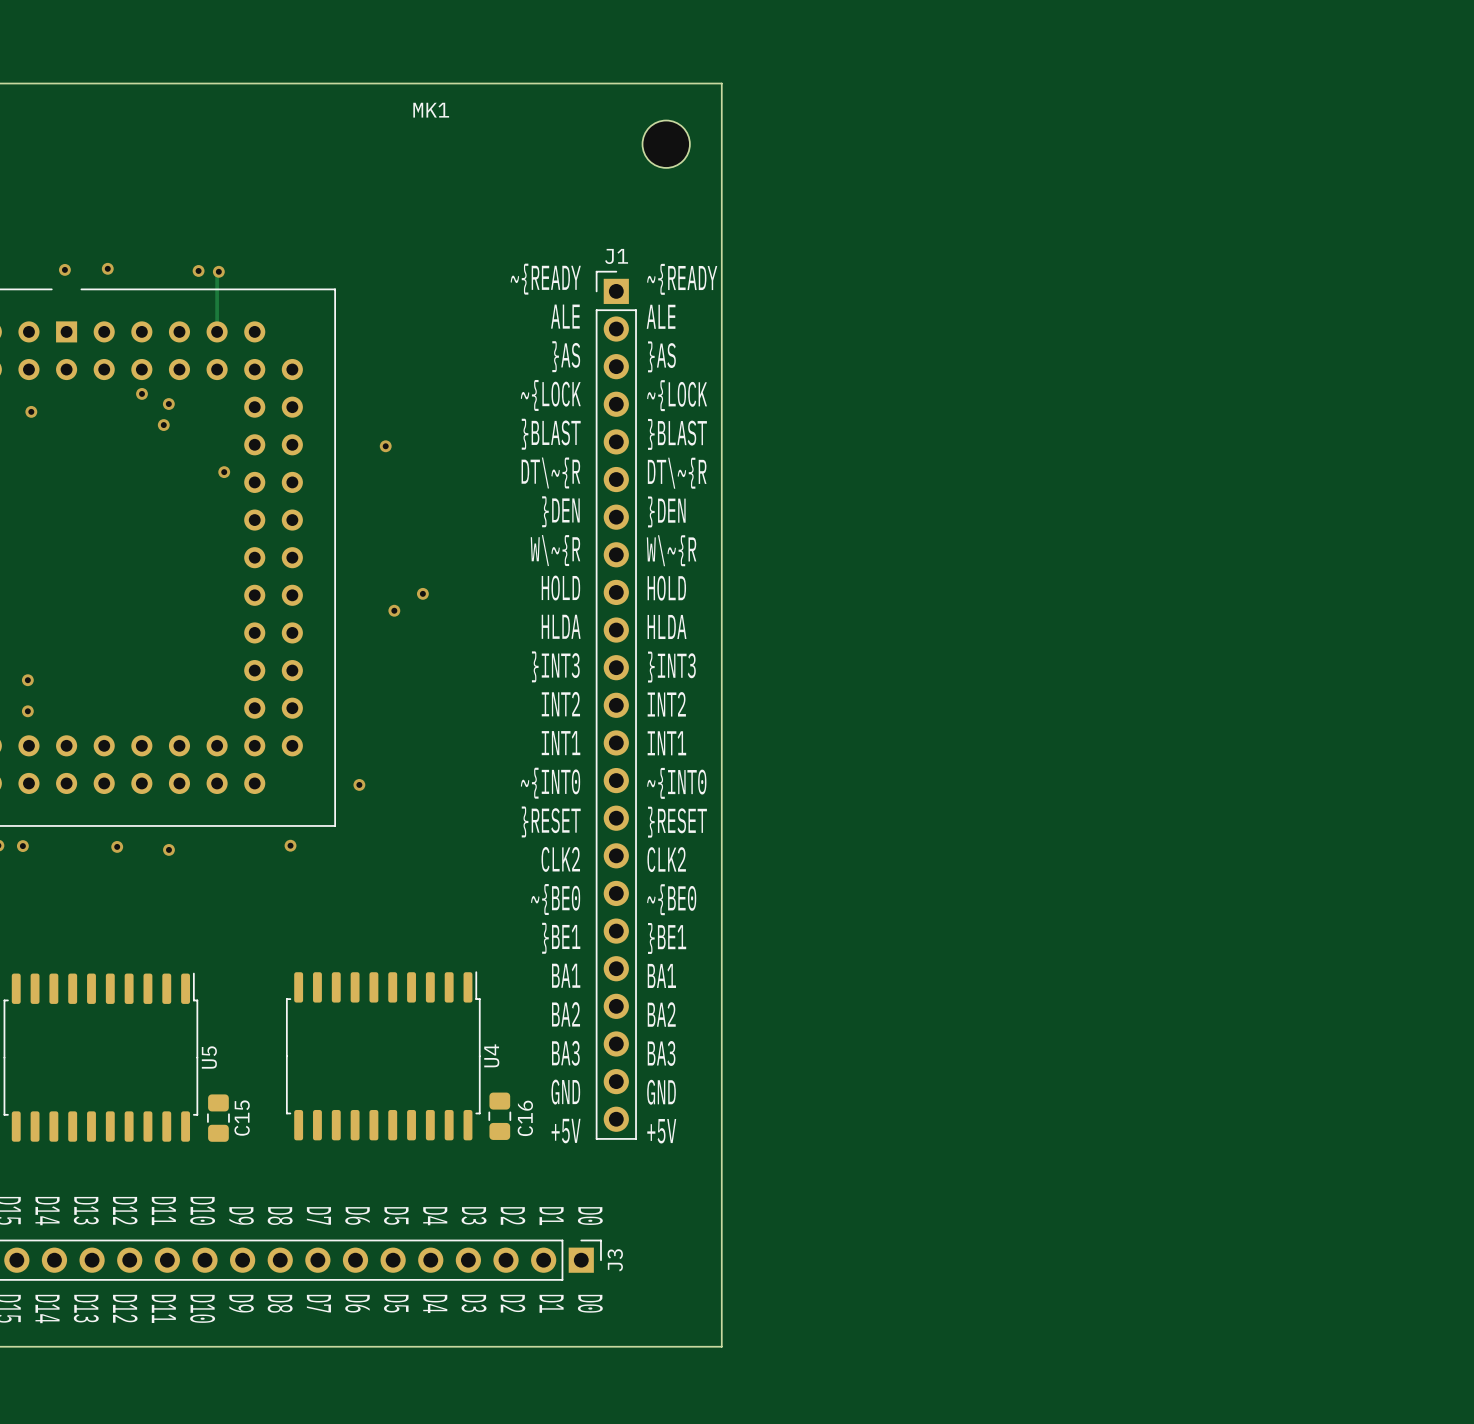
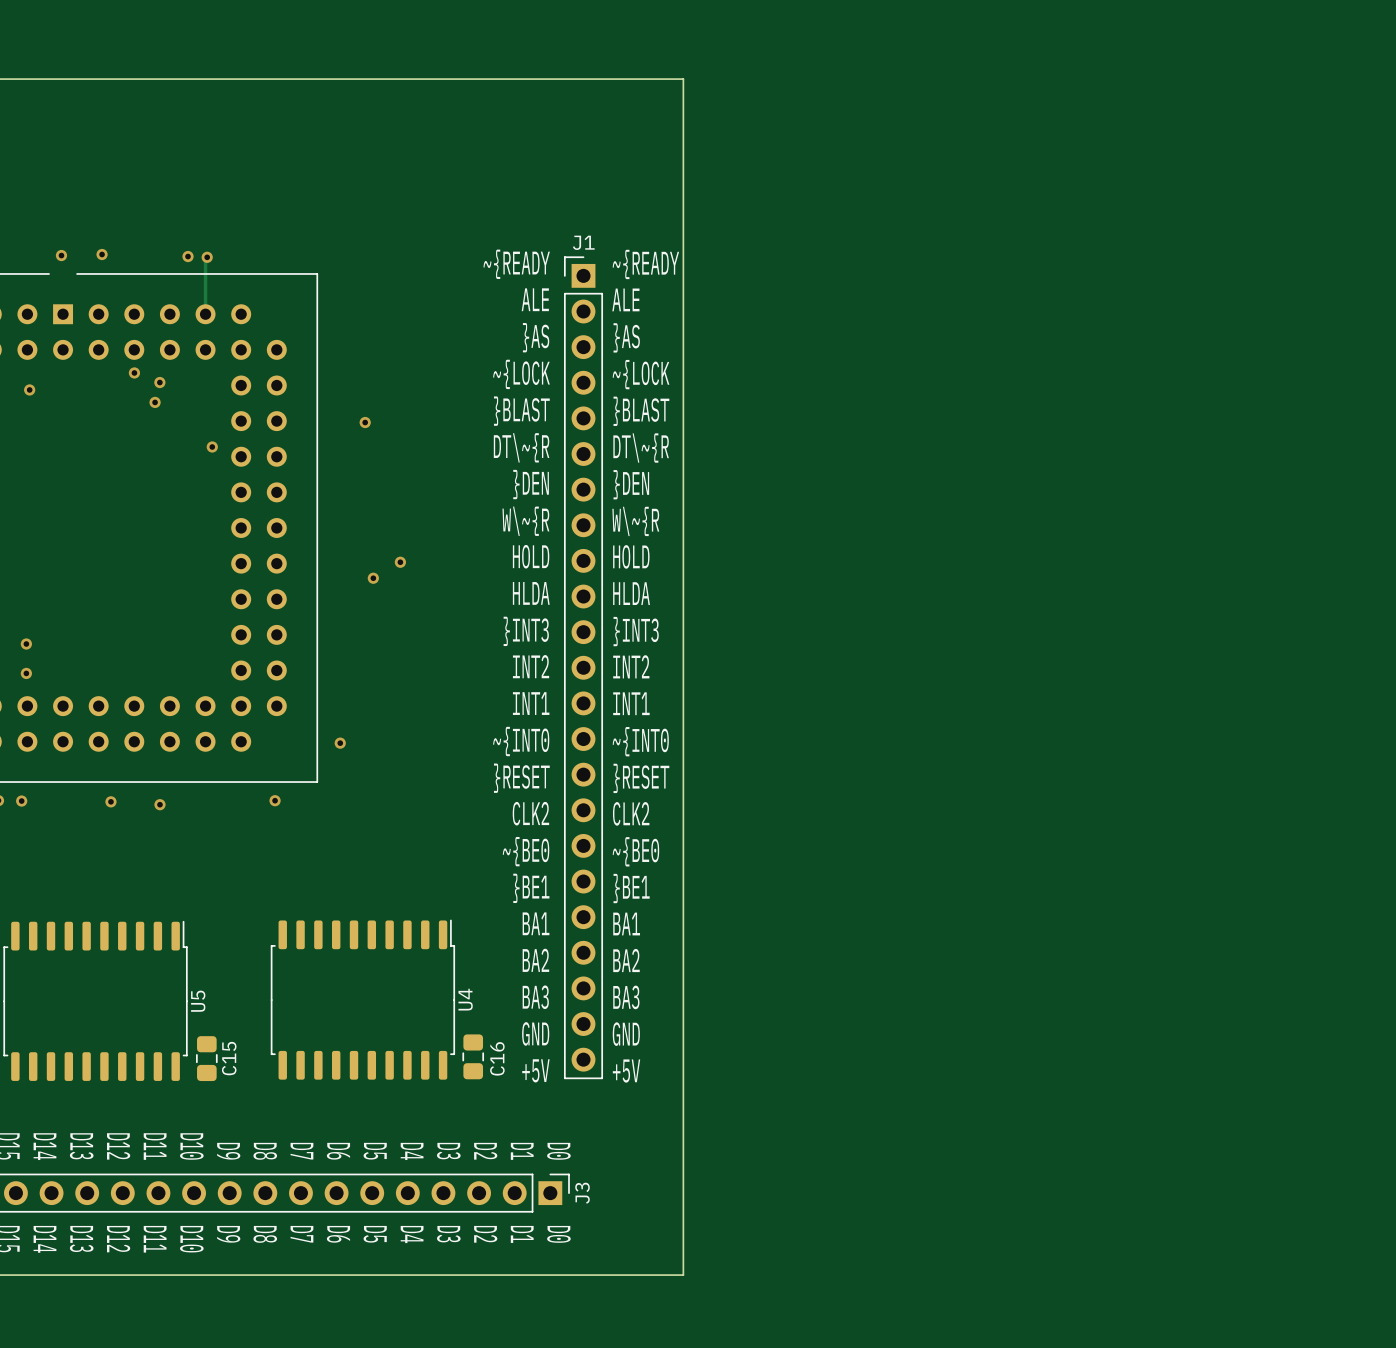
MK1: (666, 144) -> none

